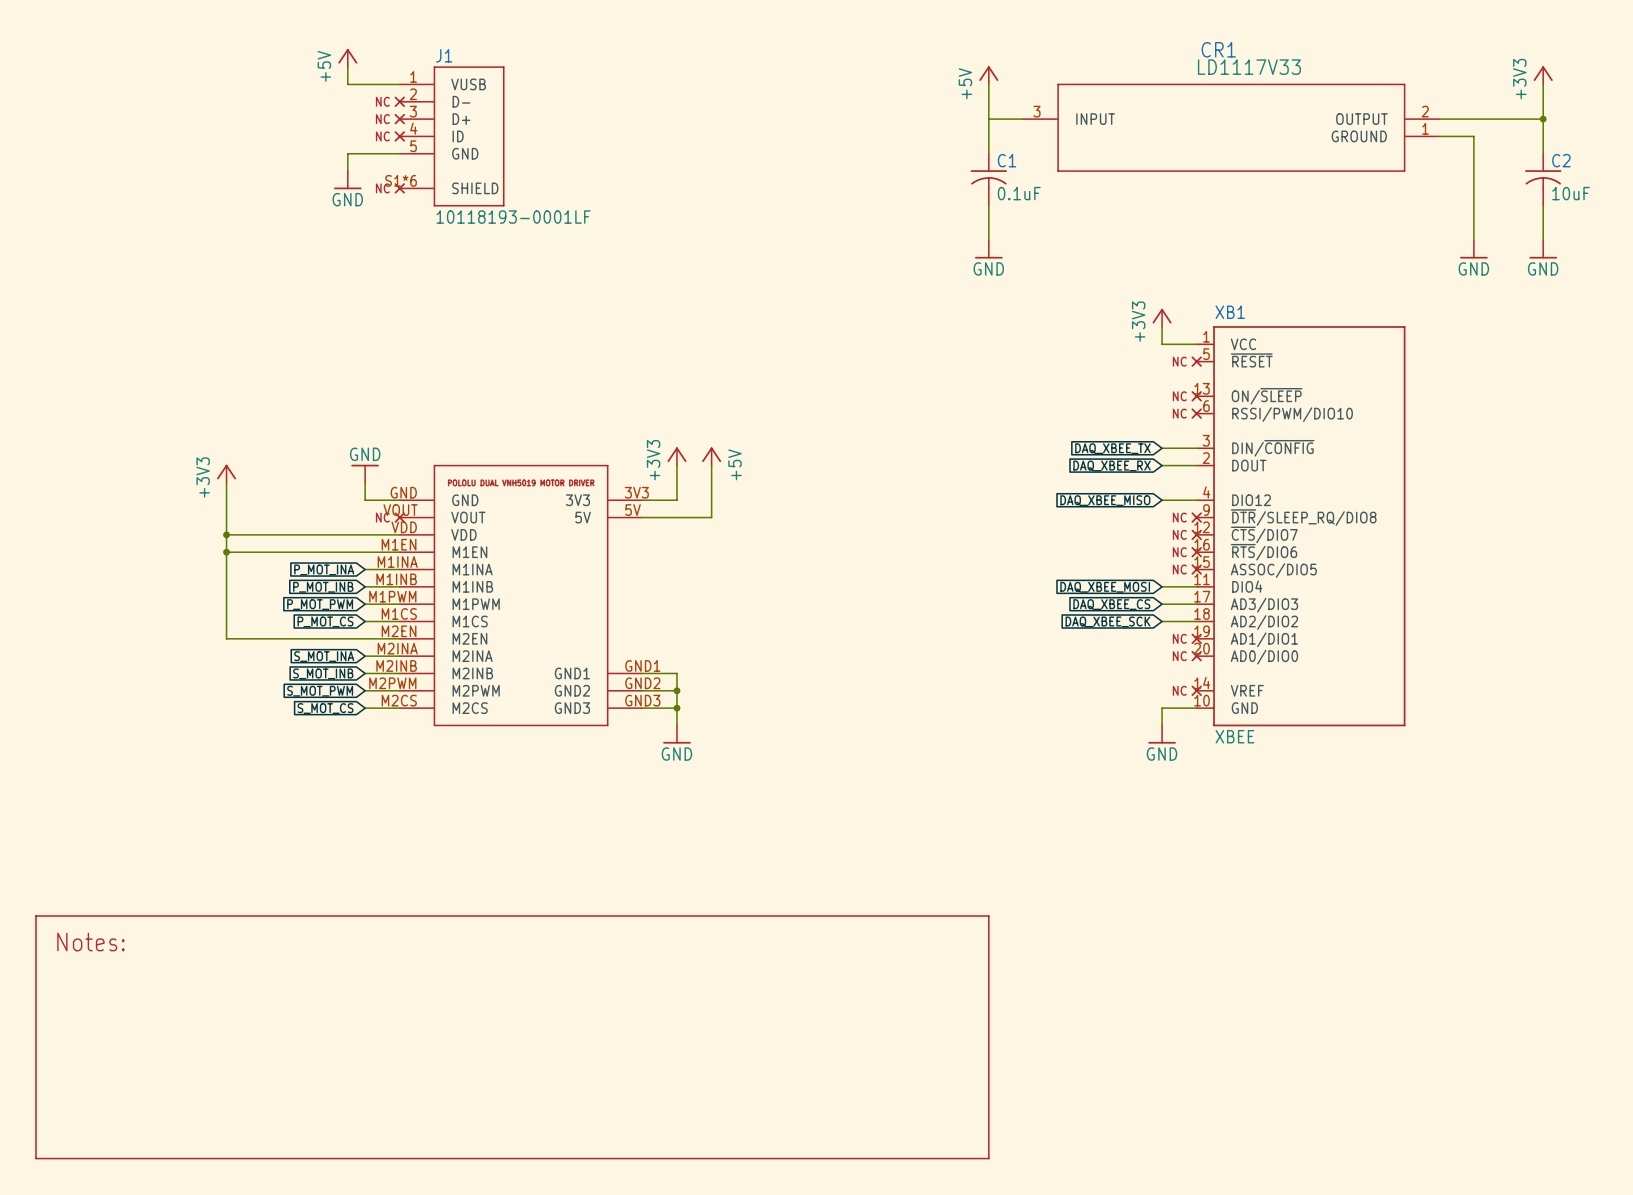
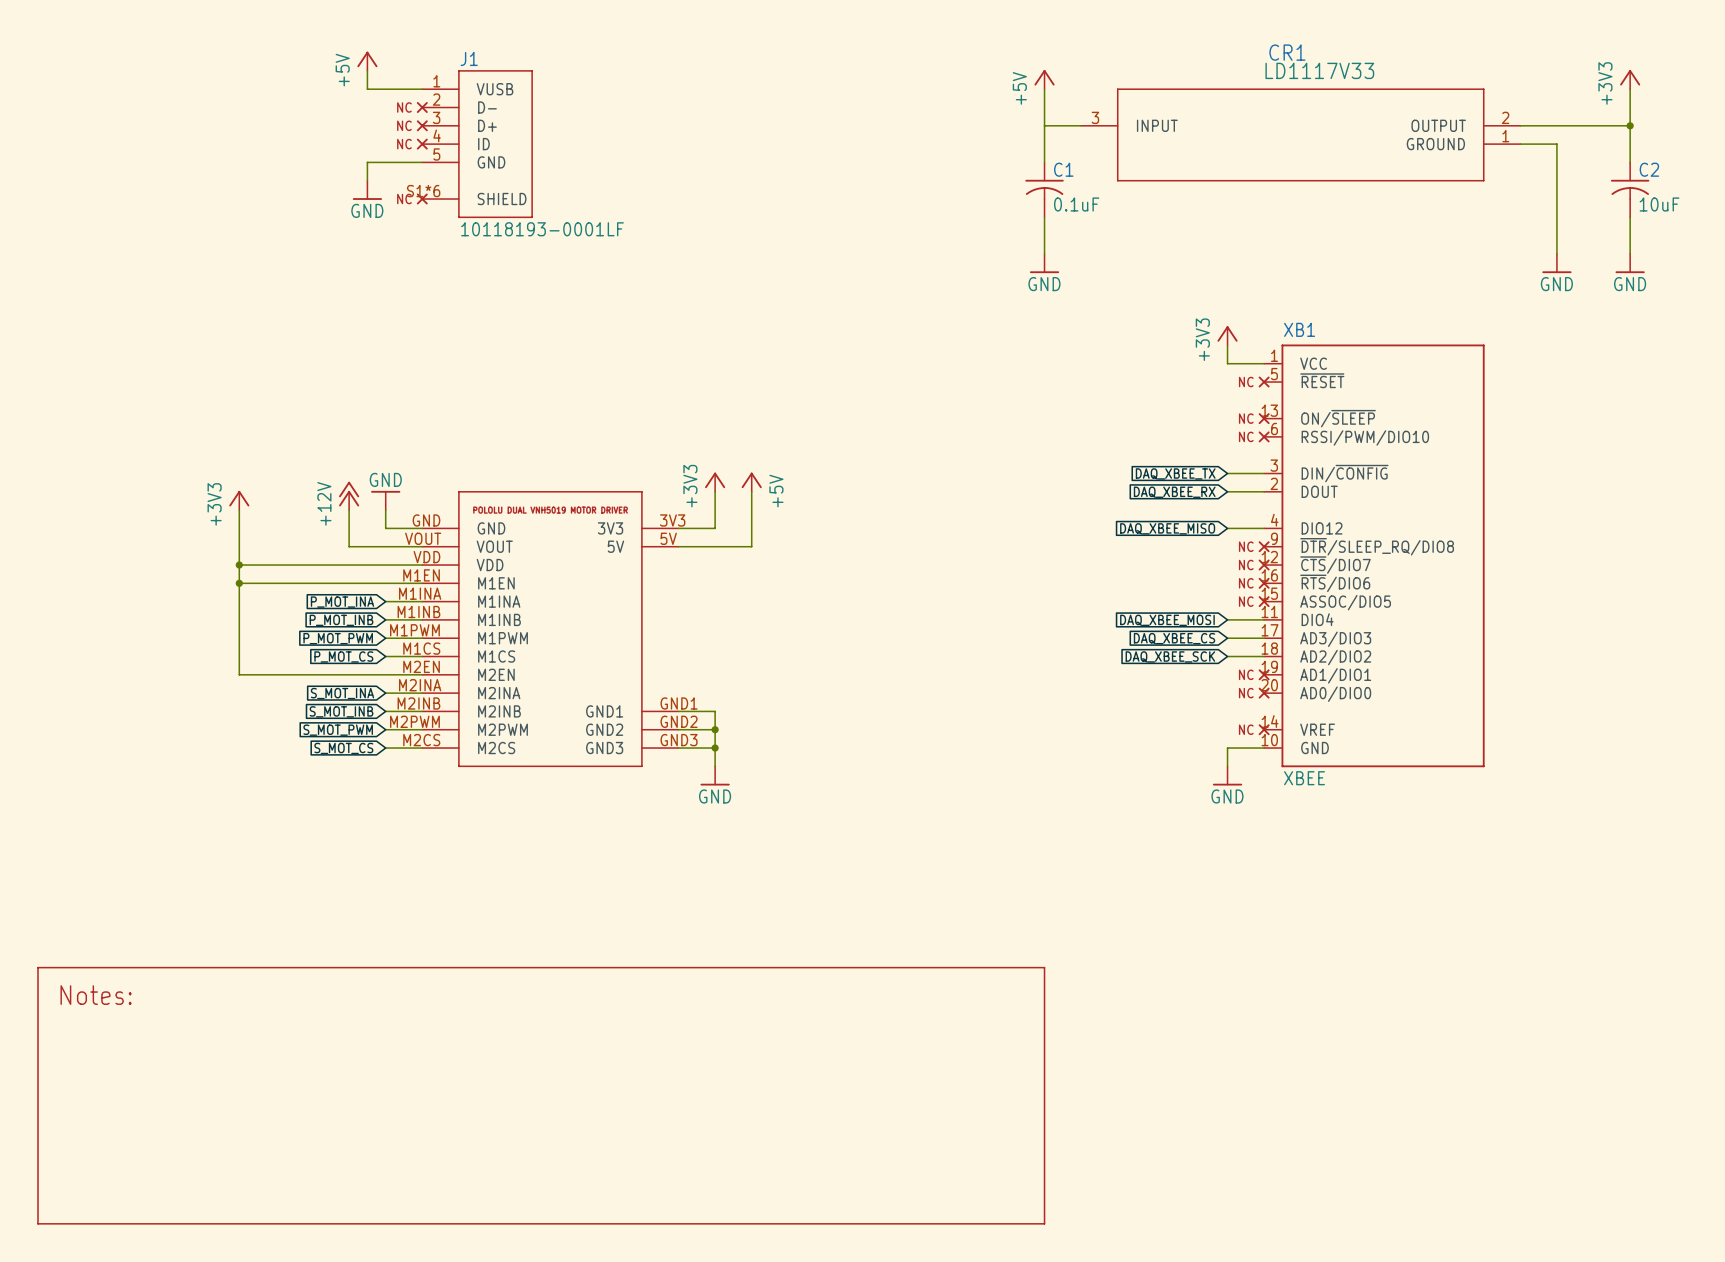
power symbol: none -> +12V (349, 495)
wire: none -> (349, 510) (349, 546) (422, 546)
part: (399, 517) -> none

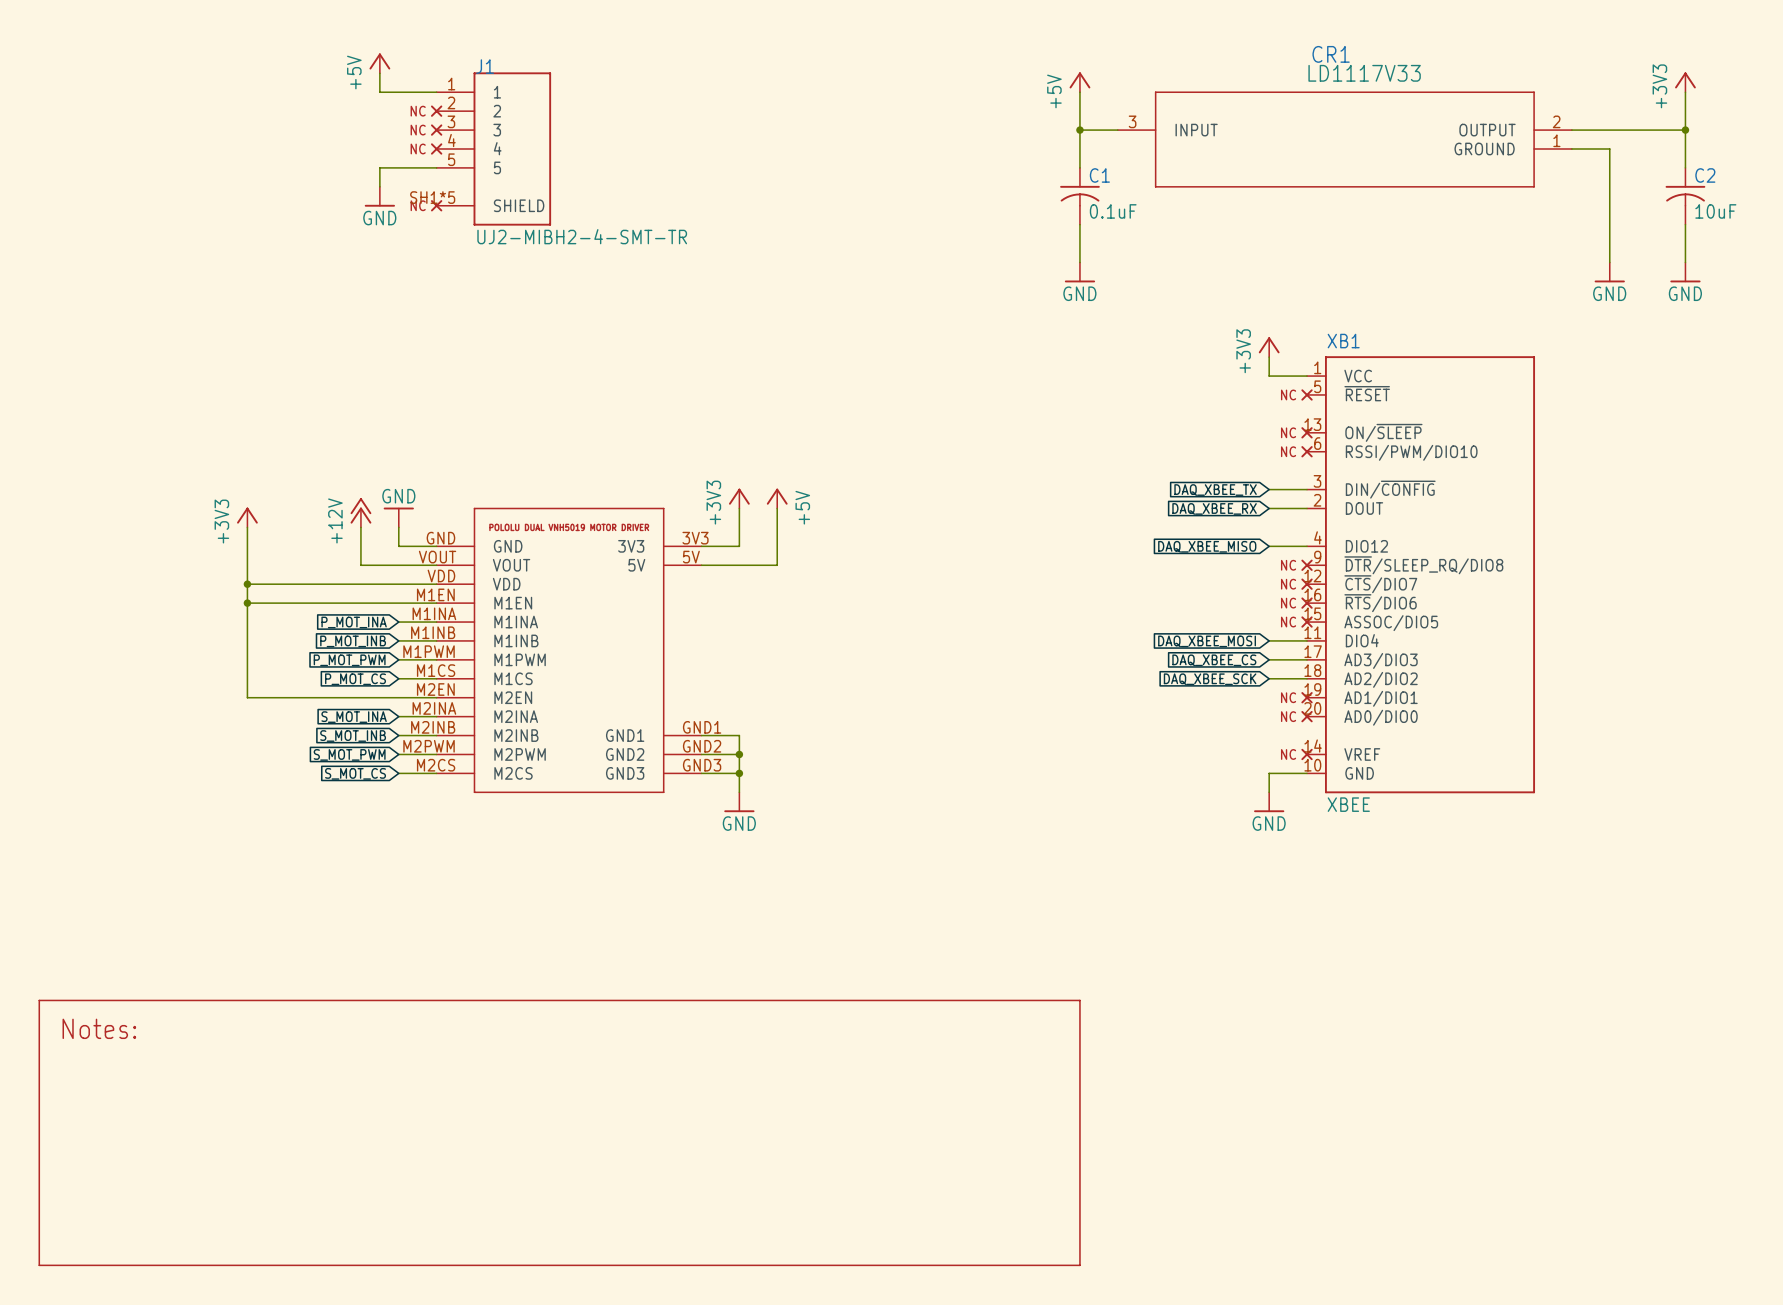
J1 symbol: [422, 70, 533, 218] -> [436, 72, 552, 226]
junction: none -> (1079, 130)
J1 value: 10118193-0001LF (542, 229) -> UJ2-MIBH2-4-SMT-TR (582, 236)

